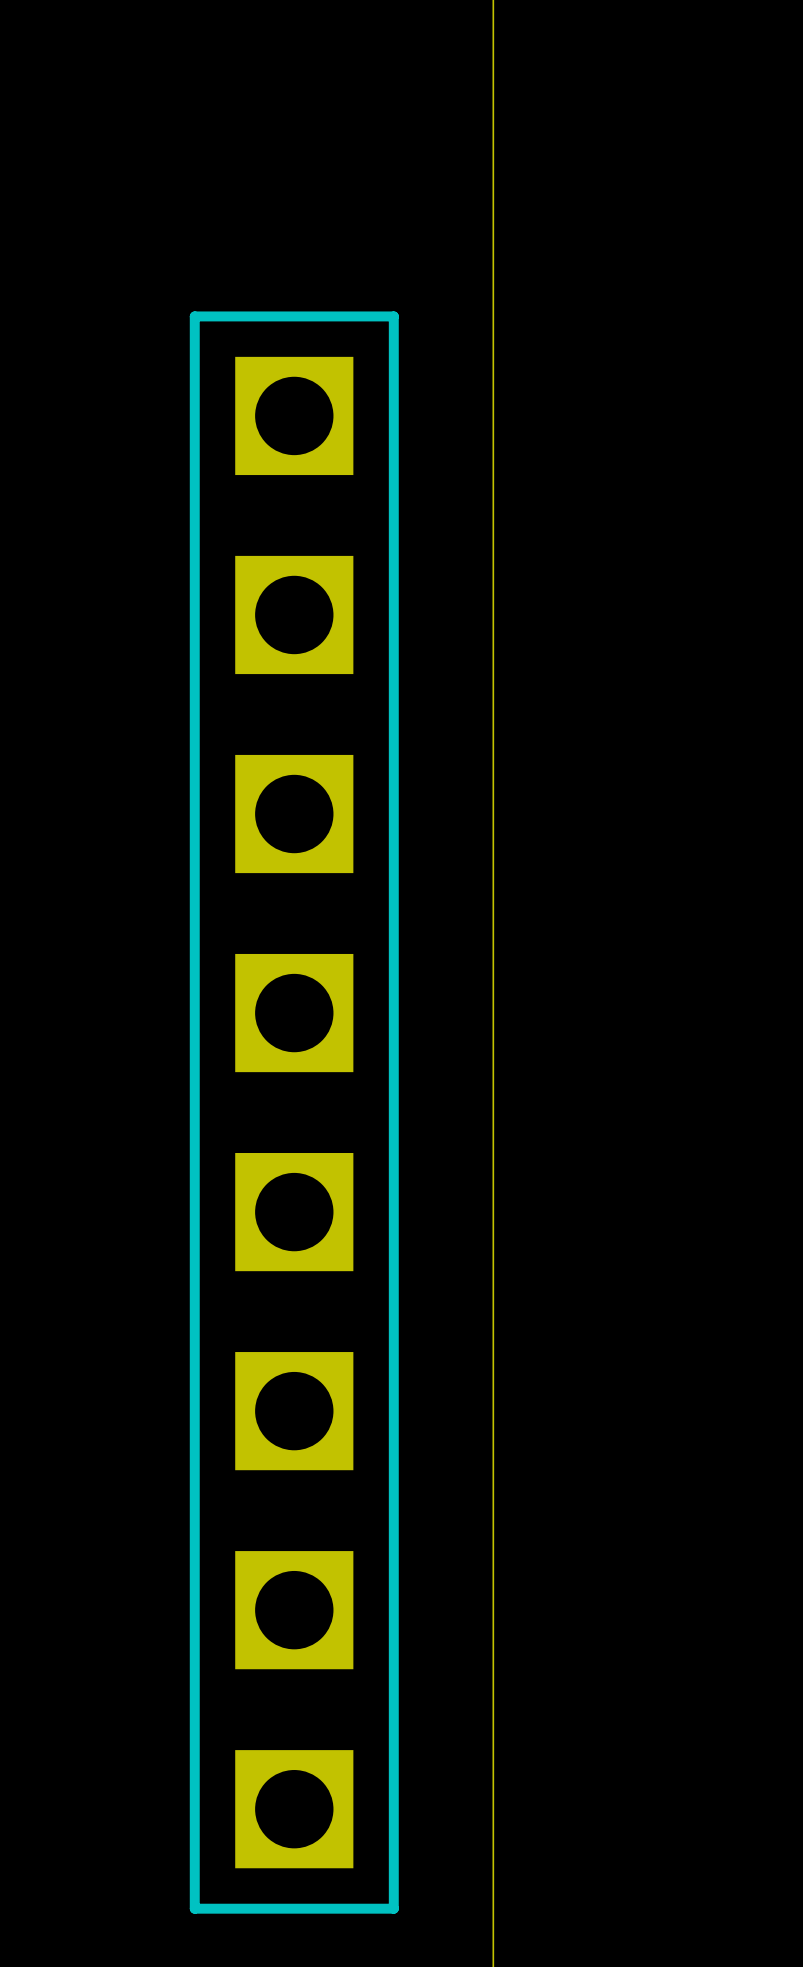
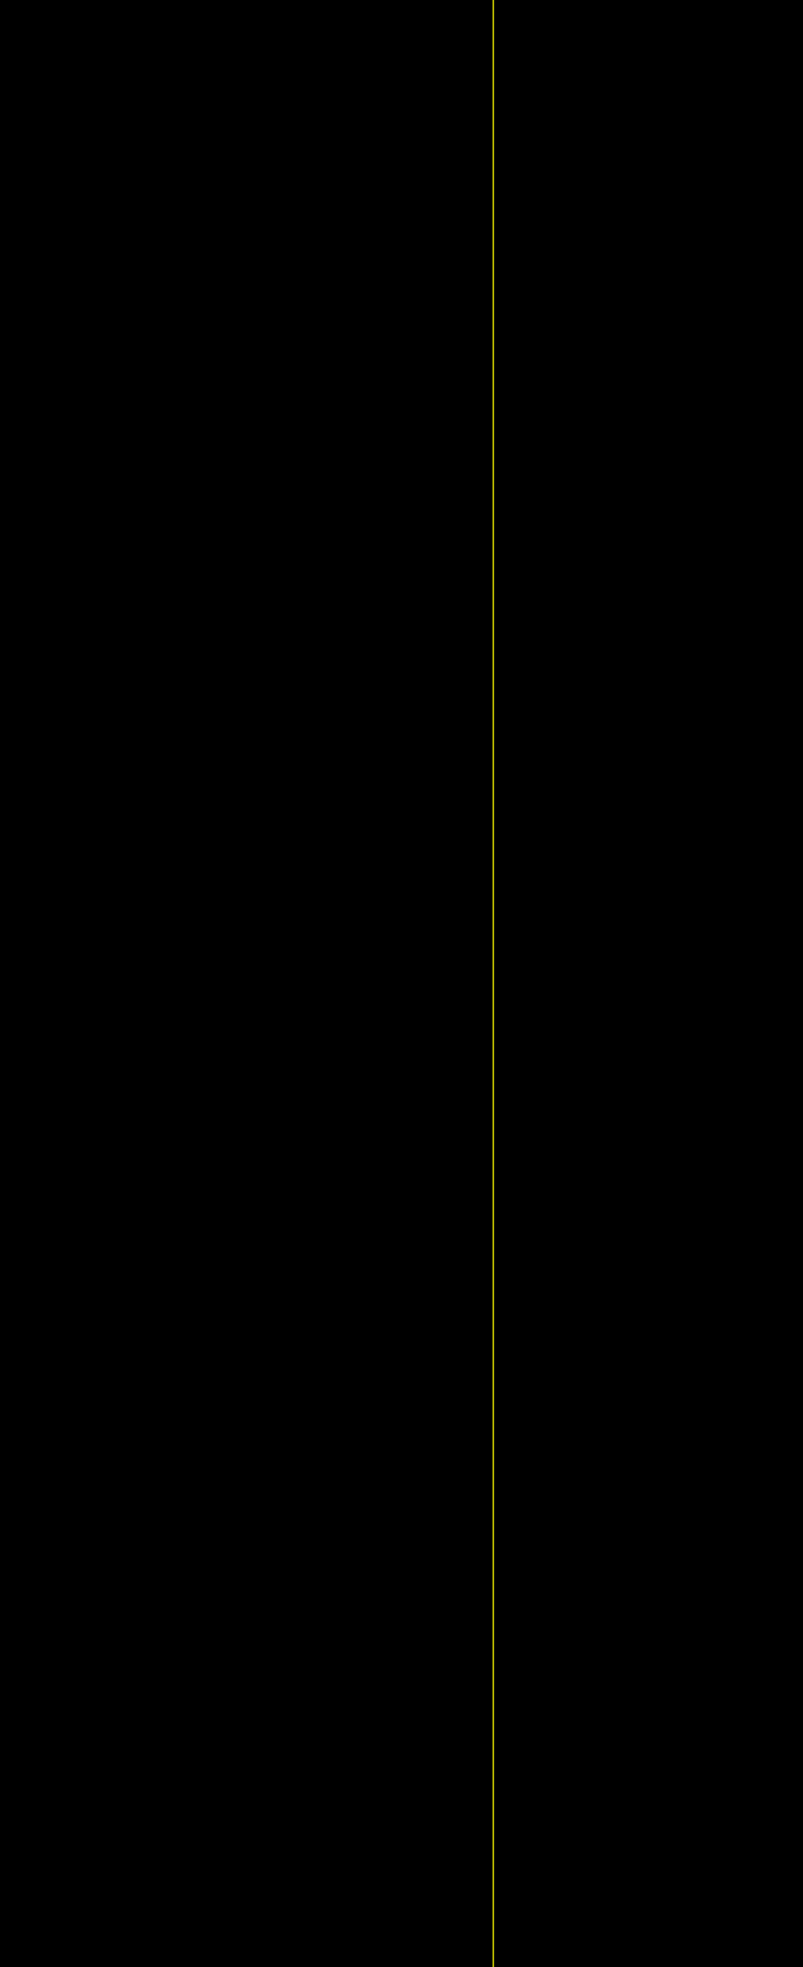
part: (294, 1112) -> none

